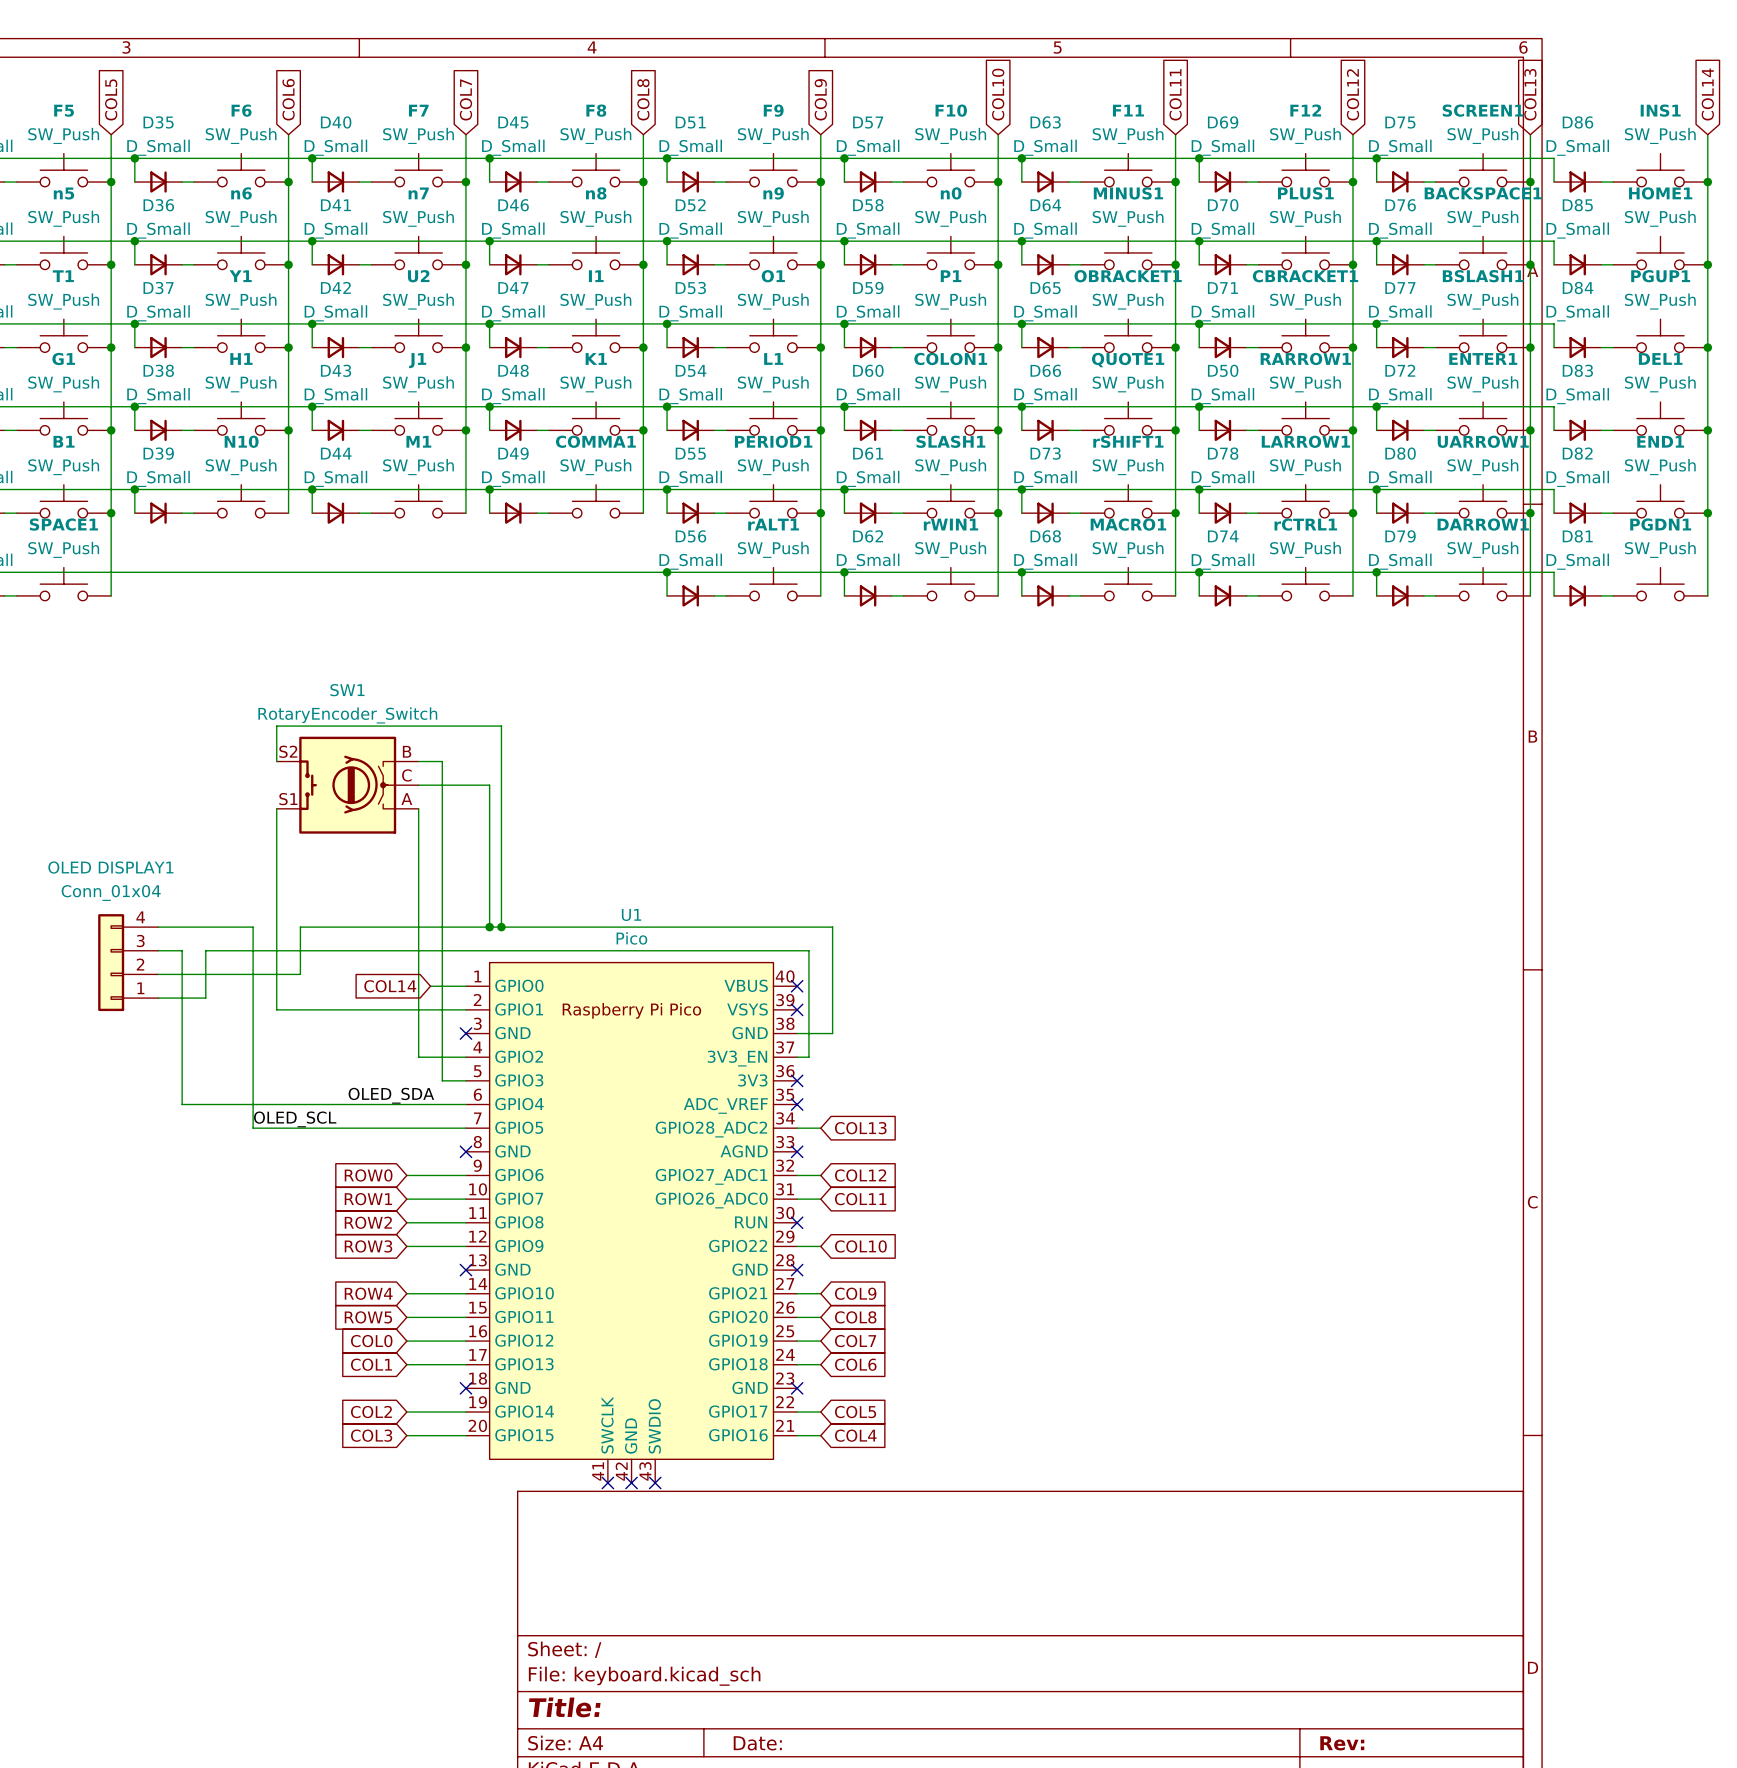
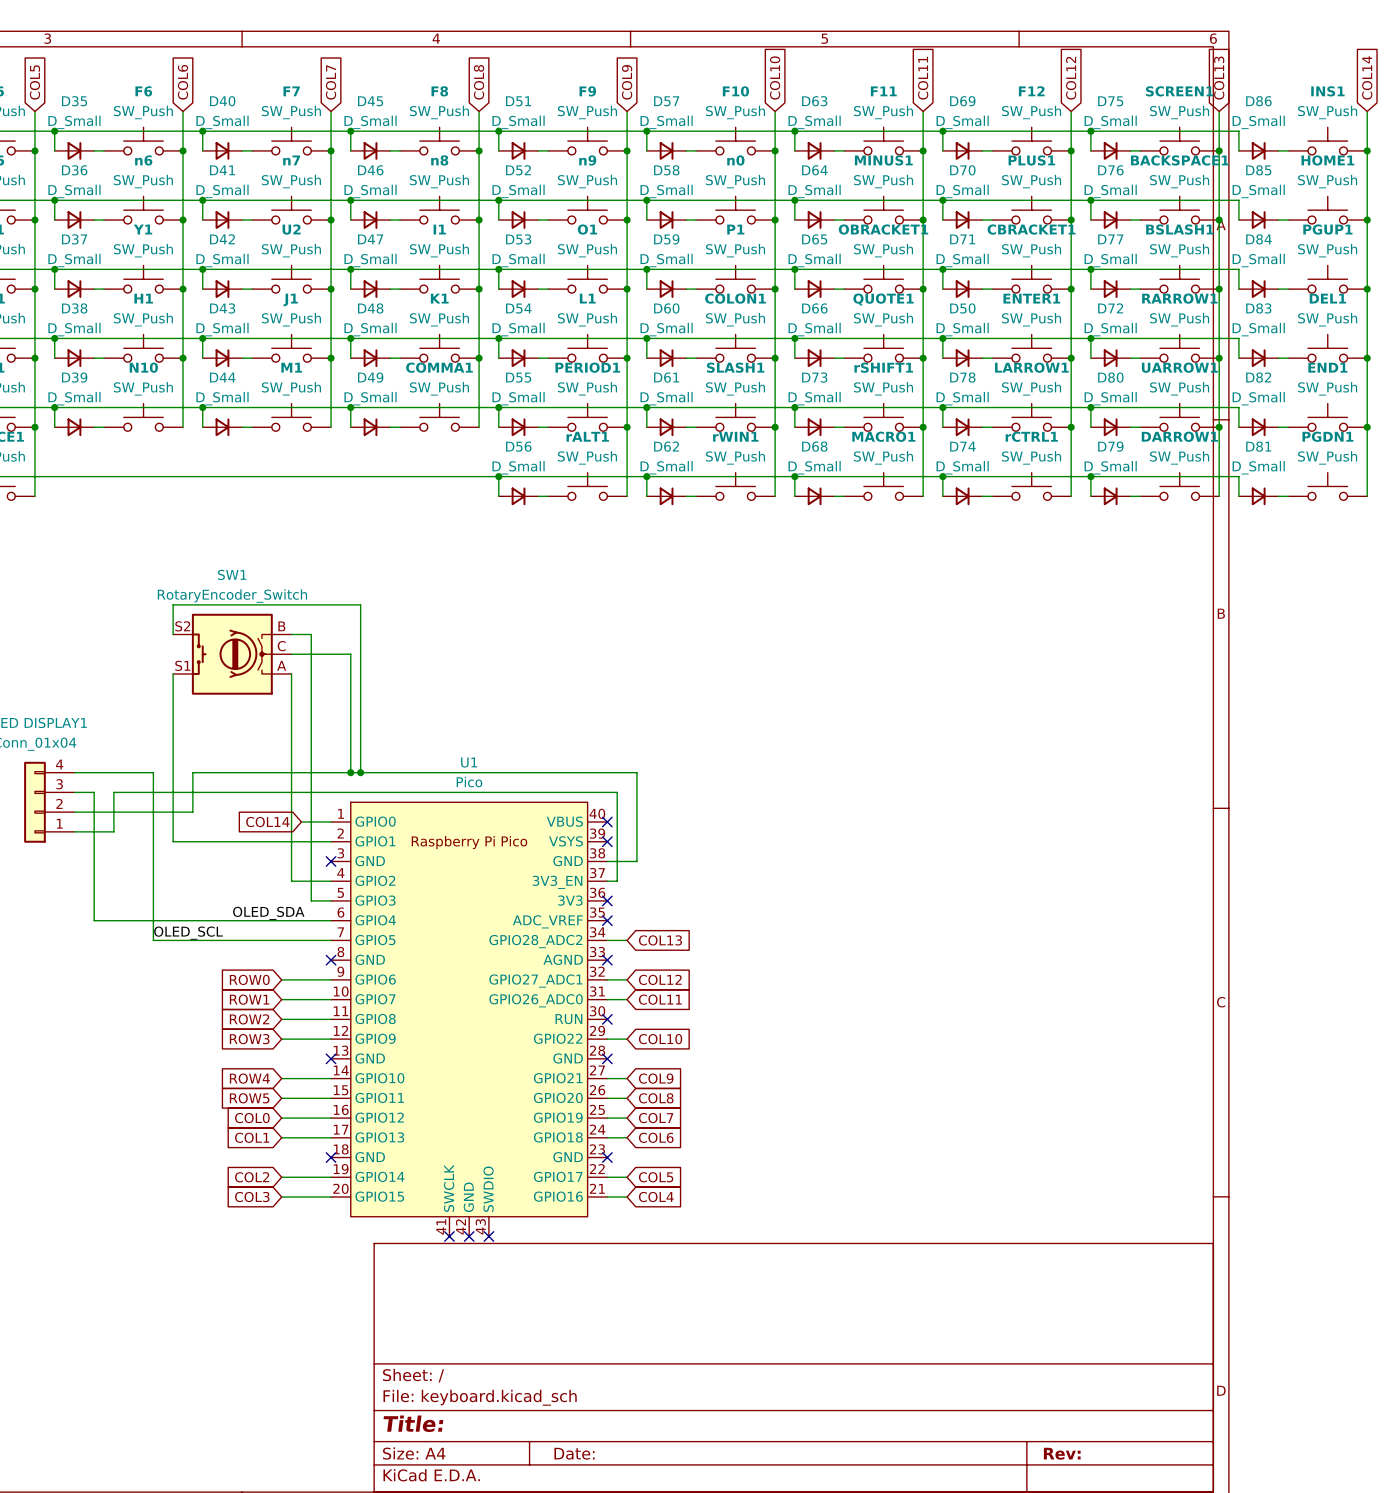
RARROW1 name: RARROW1 (1305, 358) -> ENTER1 (1031, 298)
ENTER1 name: ENTER1 (1483, 358) -> RARROW1 (1179, 298)

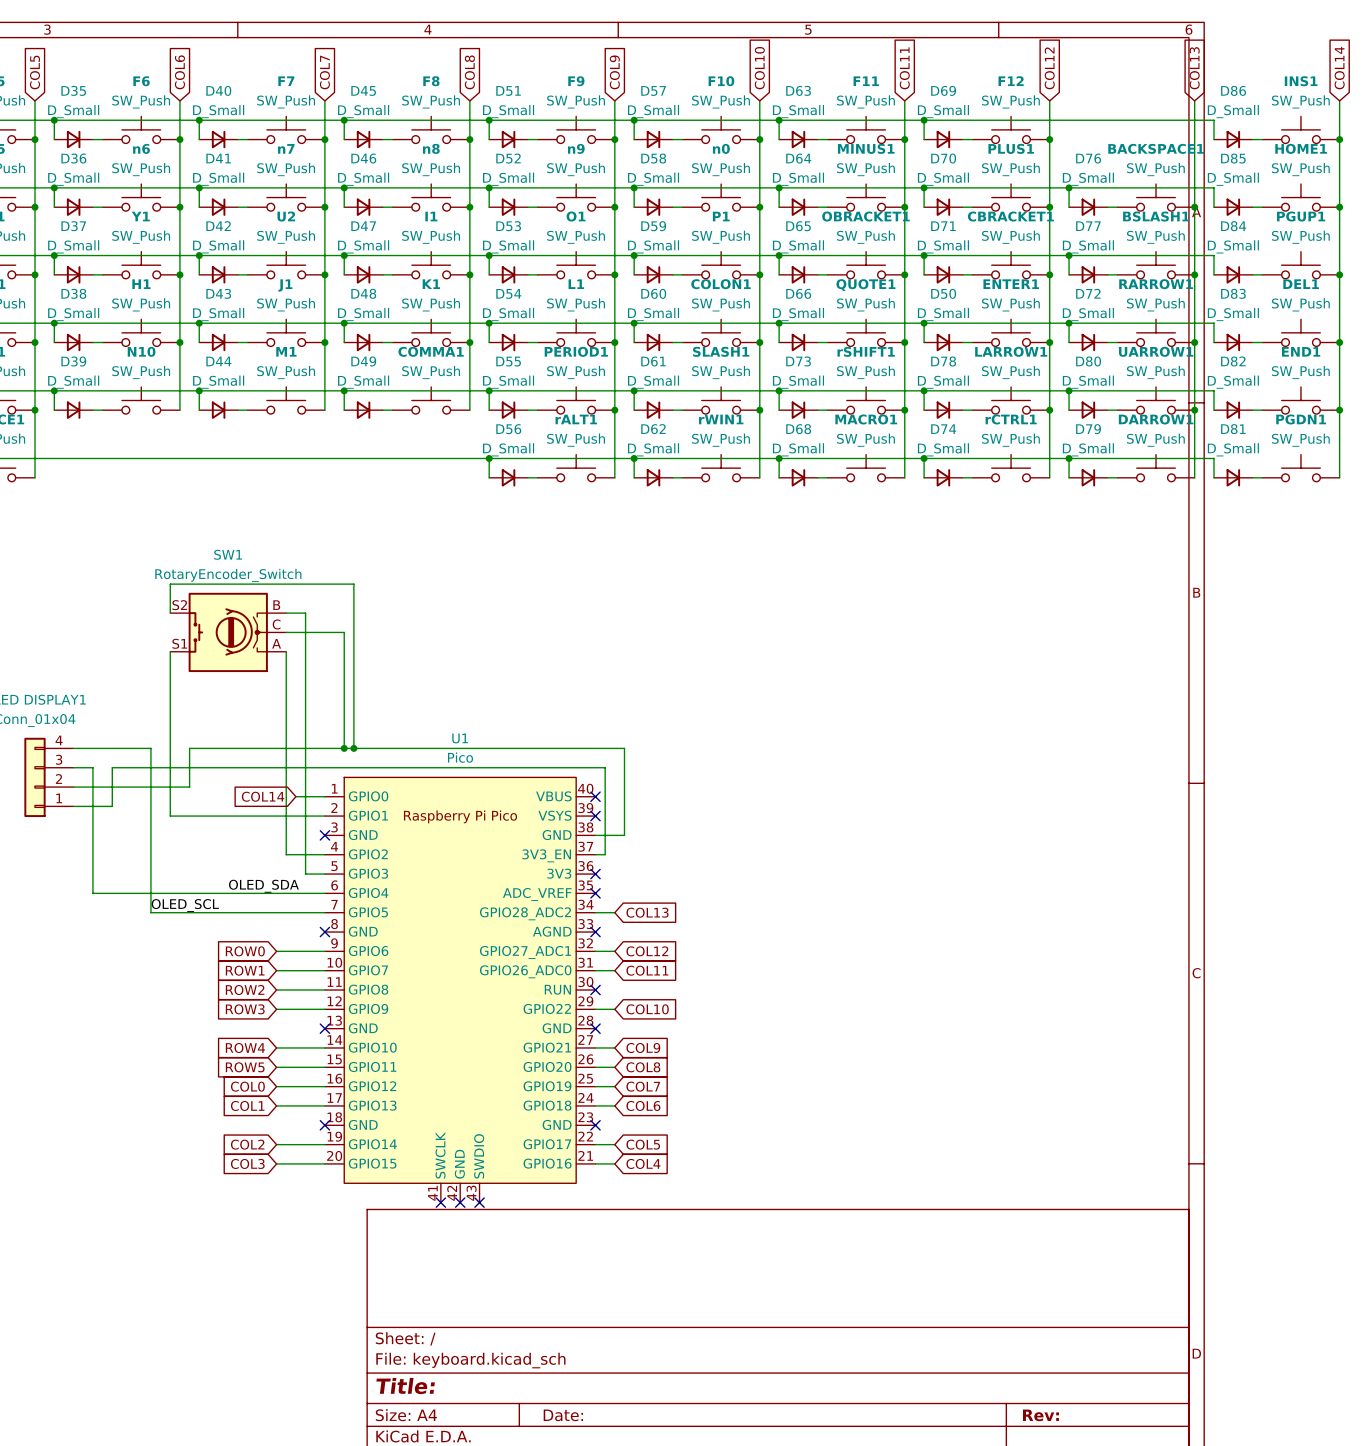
wire: (1090, 131) (1090, 150) -> none
junction: (1090, 131) -> none
SCREEN1: SW_Push (1179, 141) -> none
D75: D_Small (1110, 150) -> none
wire: (1130, 150) (1140, 150) -> none
junction: (1219, 150) -> none

